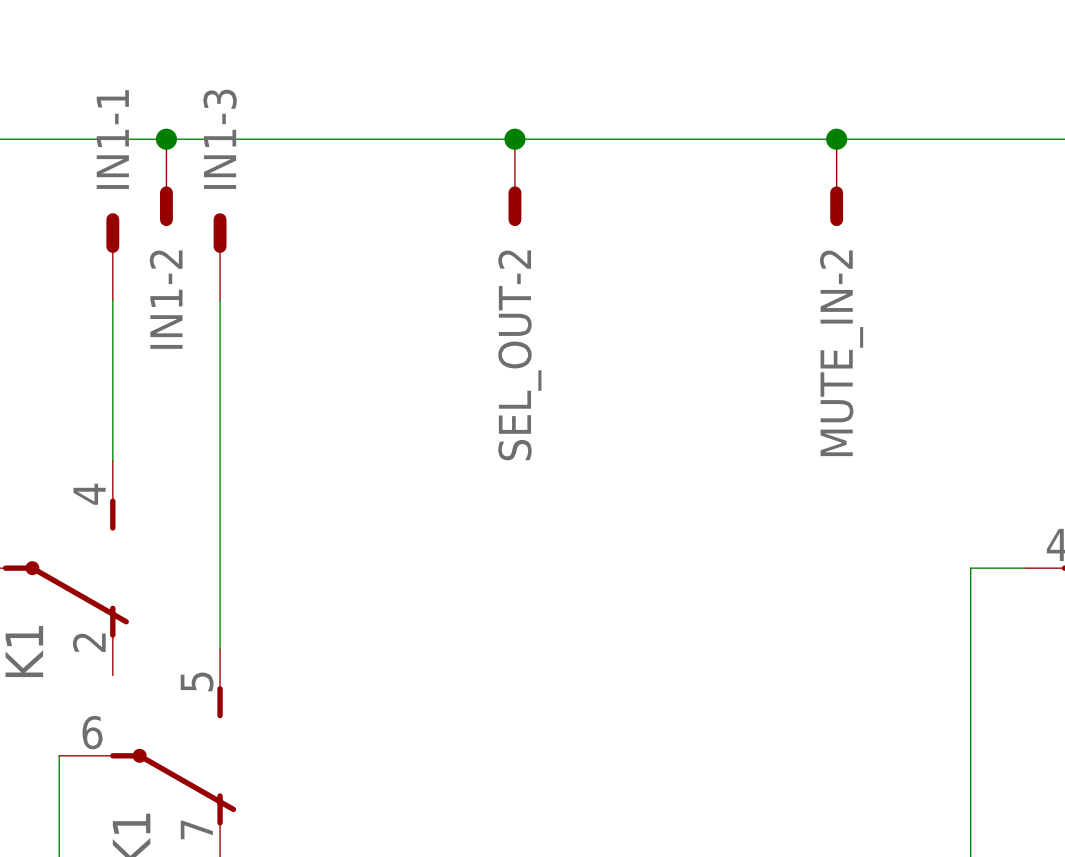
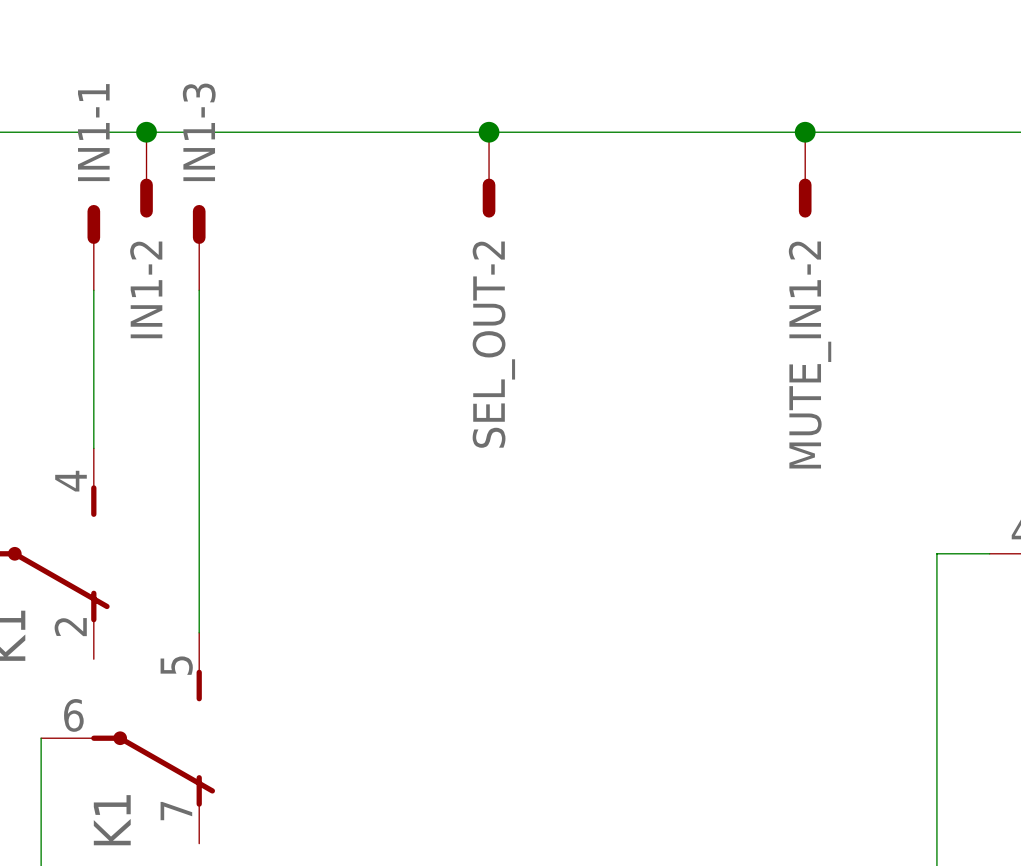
MUTE_IN-2 name: MUTE_IN-2 (841, 353) -> MUTE_IN1-2 (810, 355)

